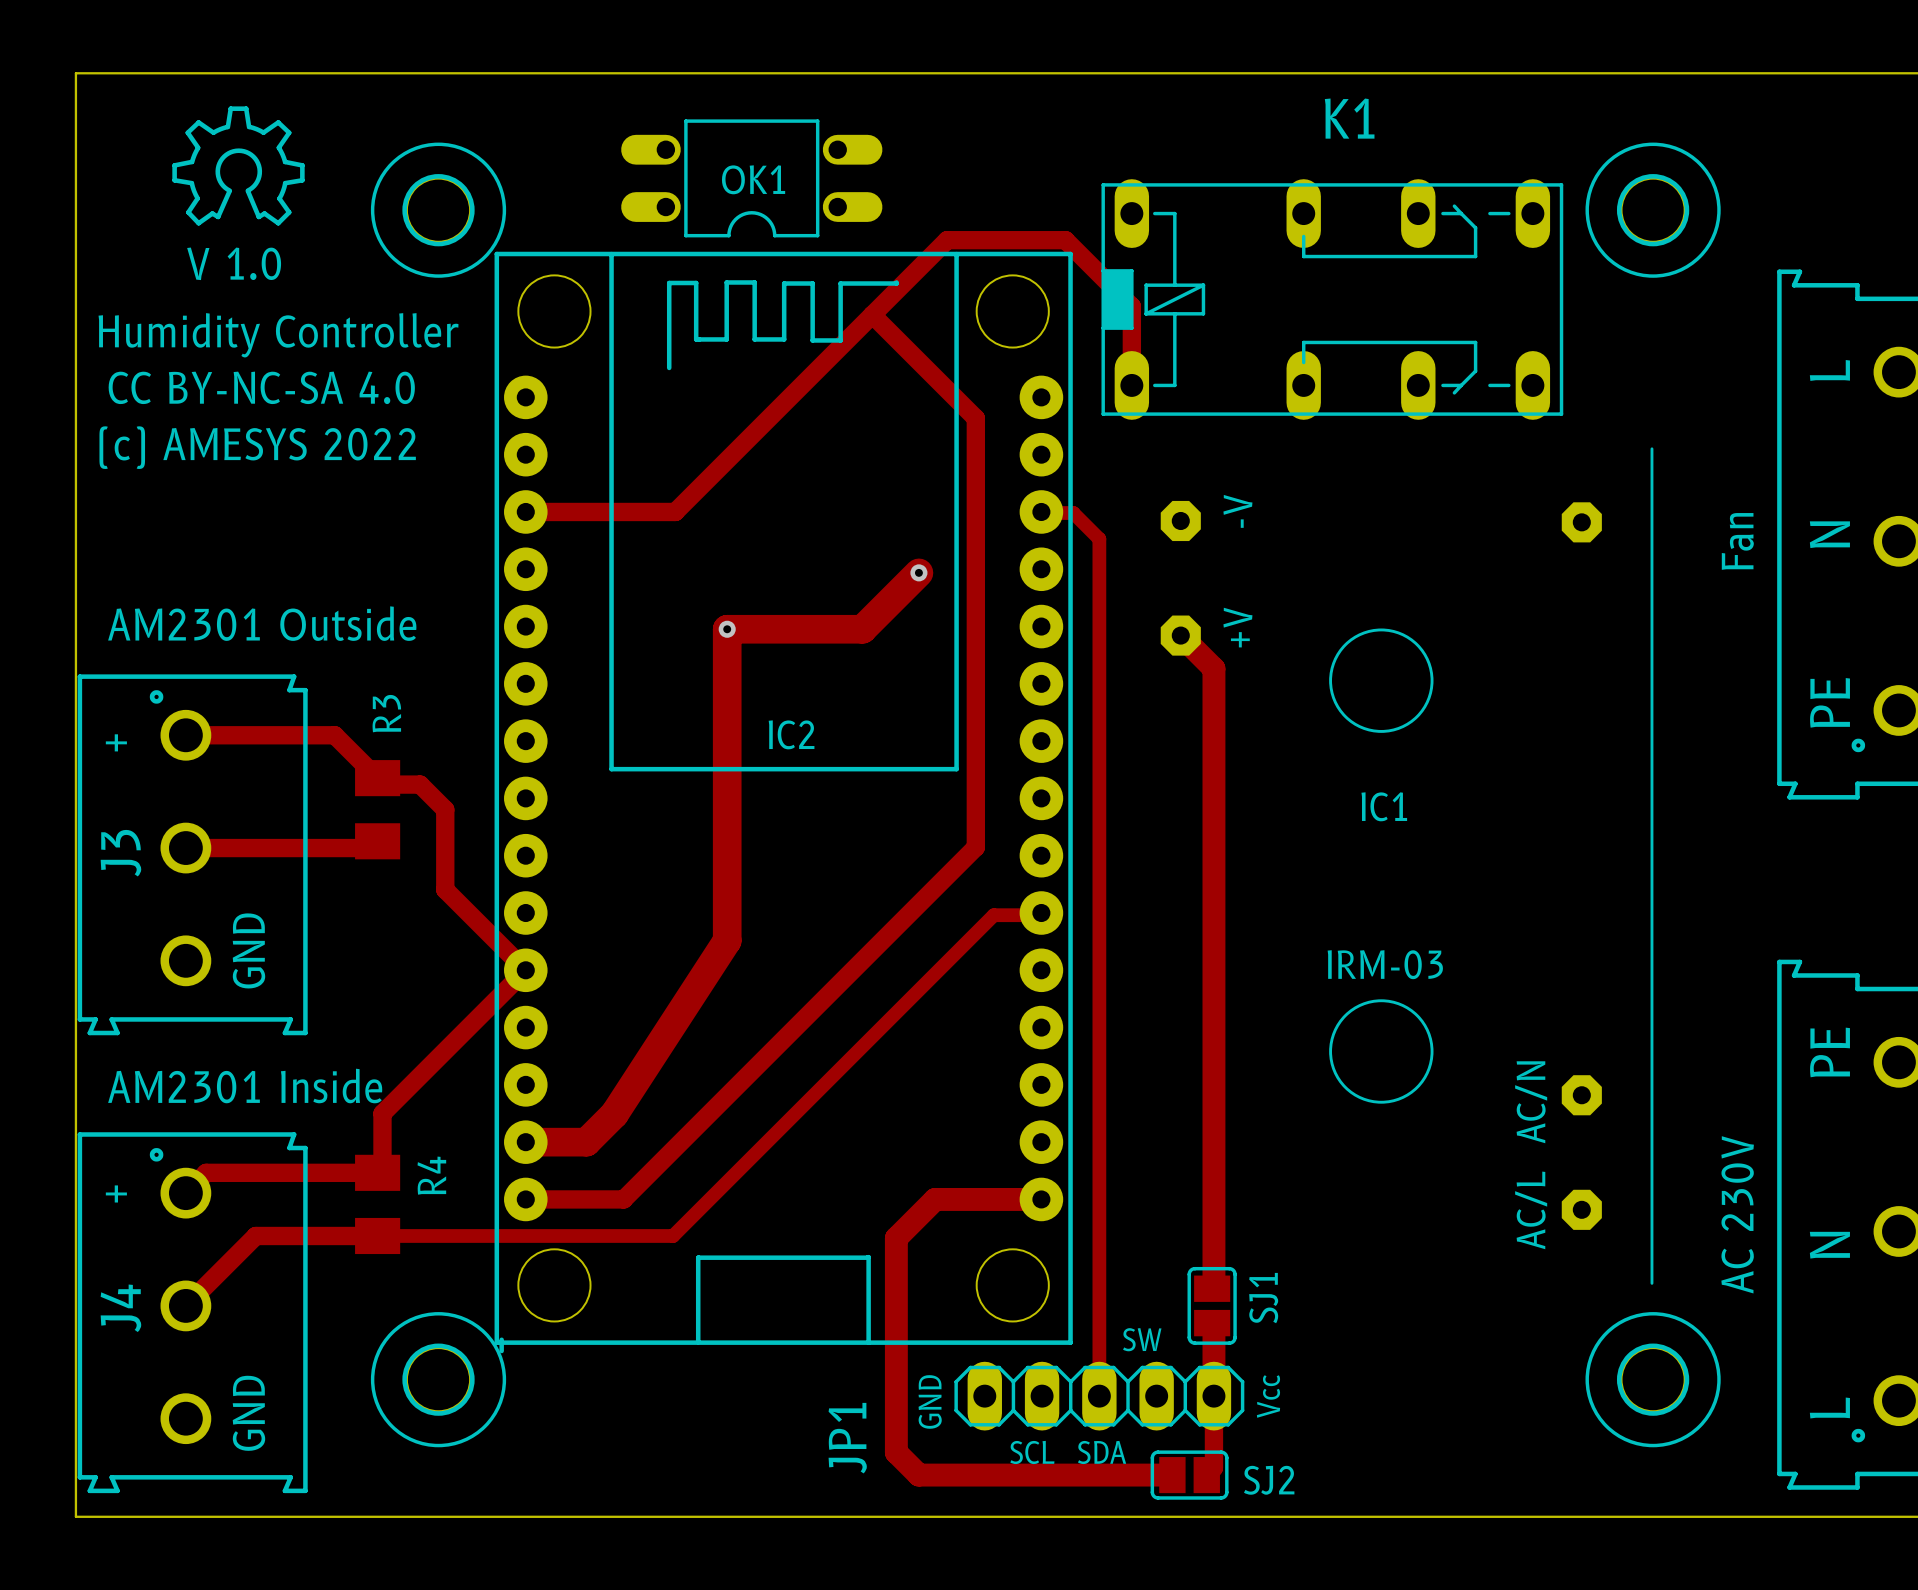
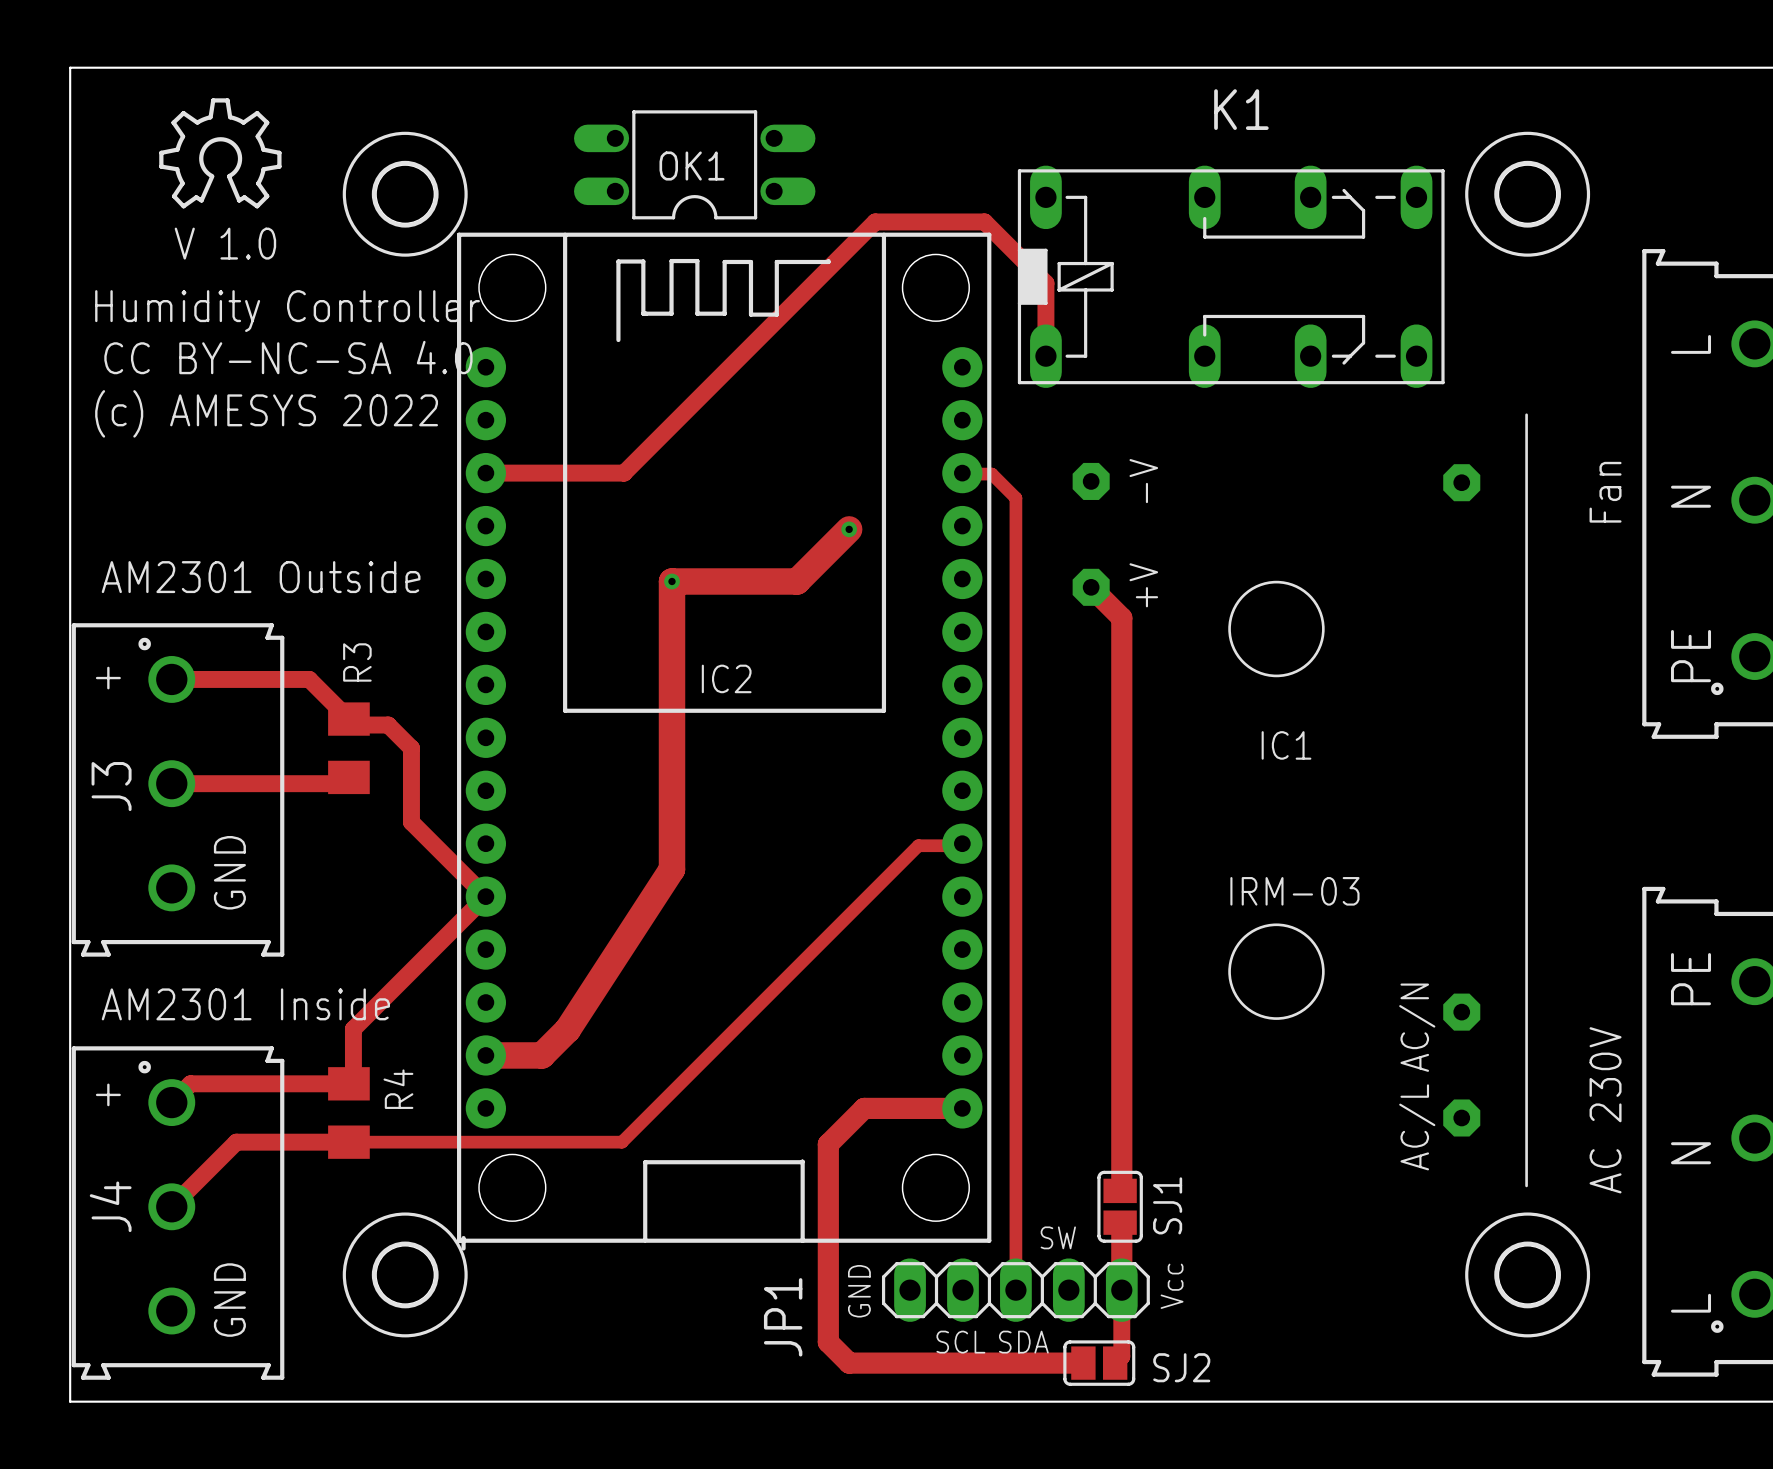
track: (872, 314) (975, 418) (975, 847) (623, 1199) (525, 1199) -> none

